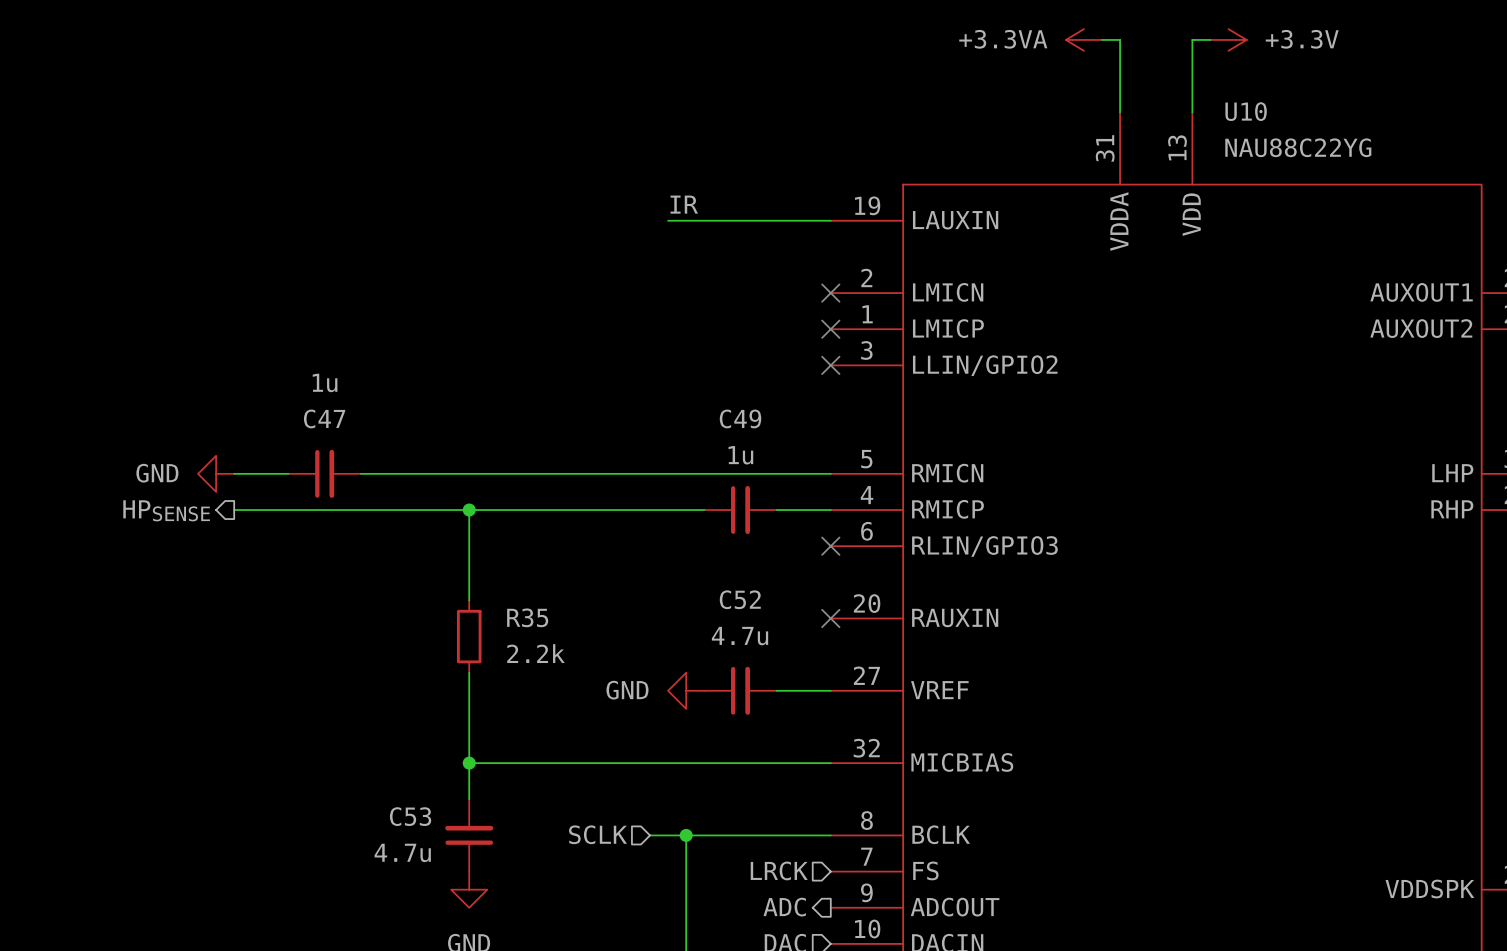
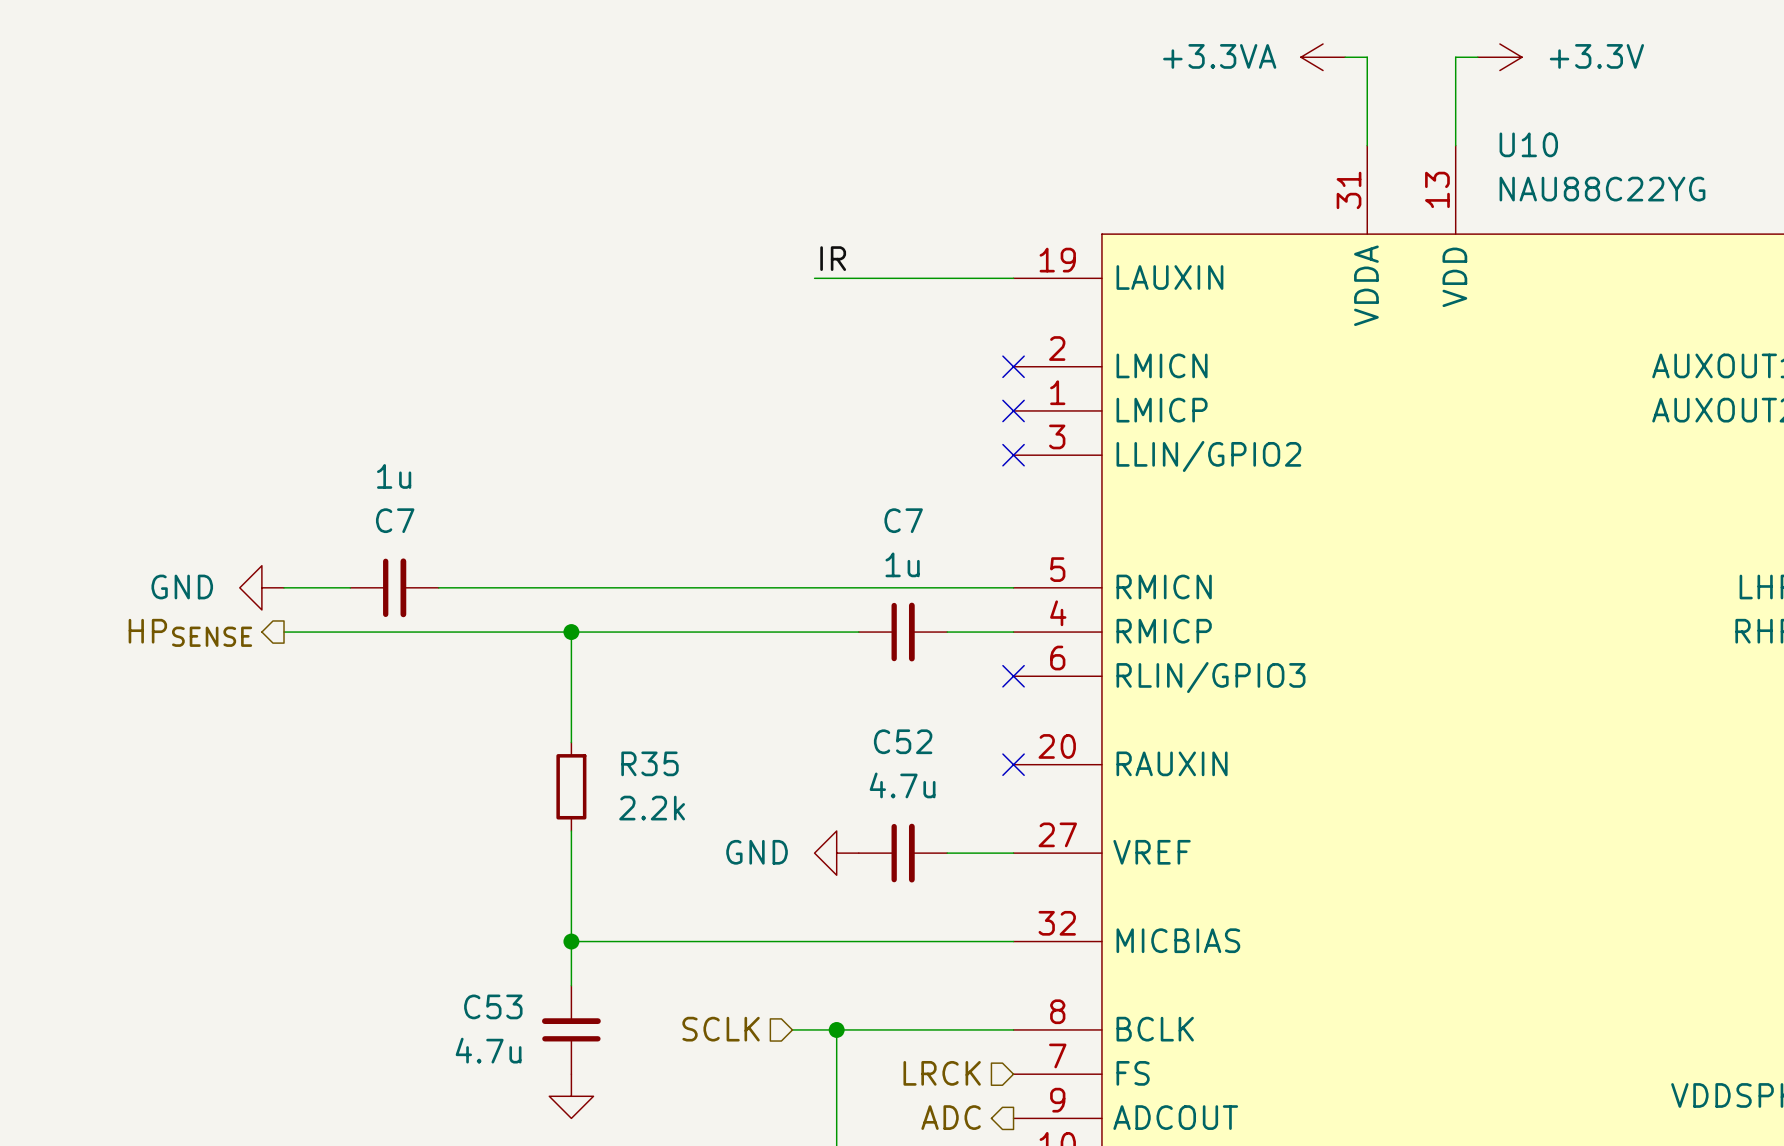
C47 name: C47 (324, 418) -> C7 (395, 520)
C49 name: C49 (740, 418) -> C7 (903, 520)

